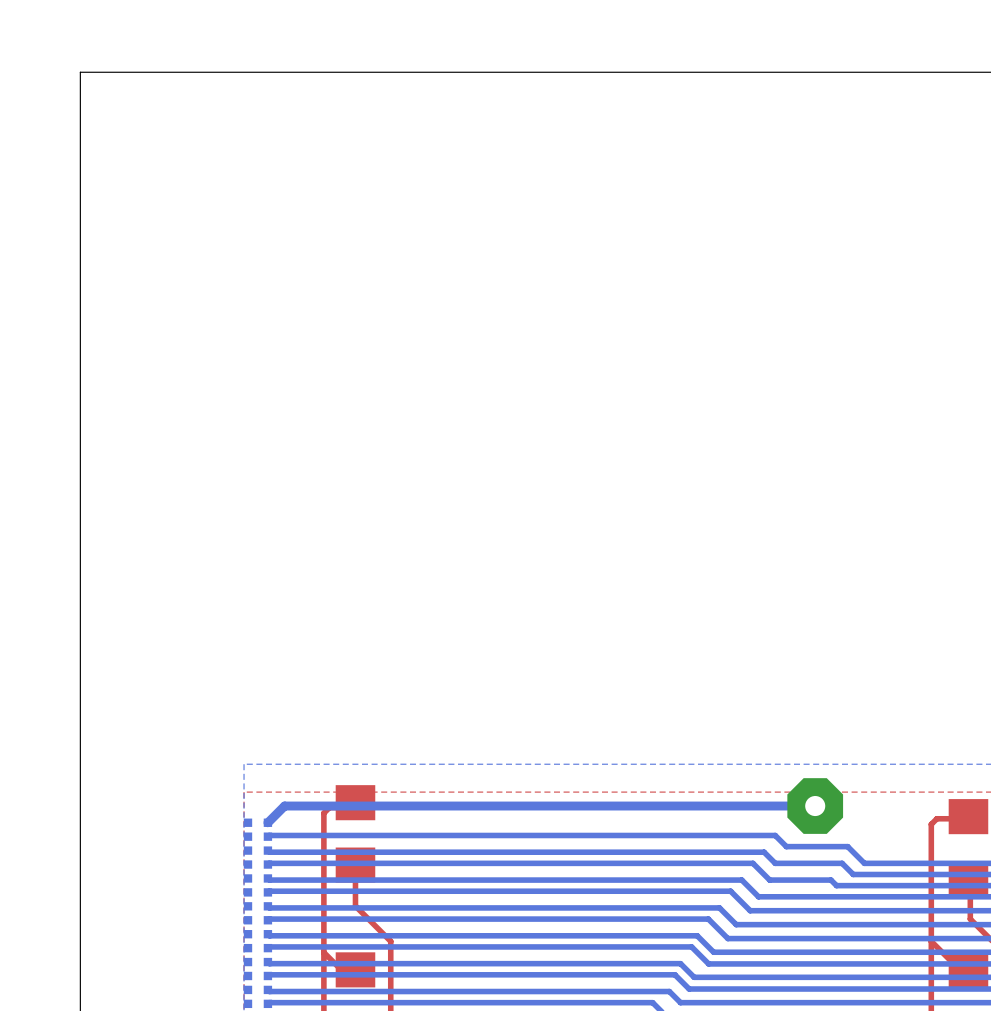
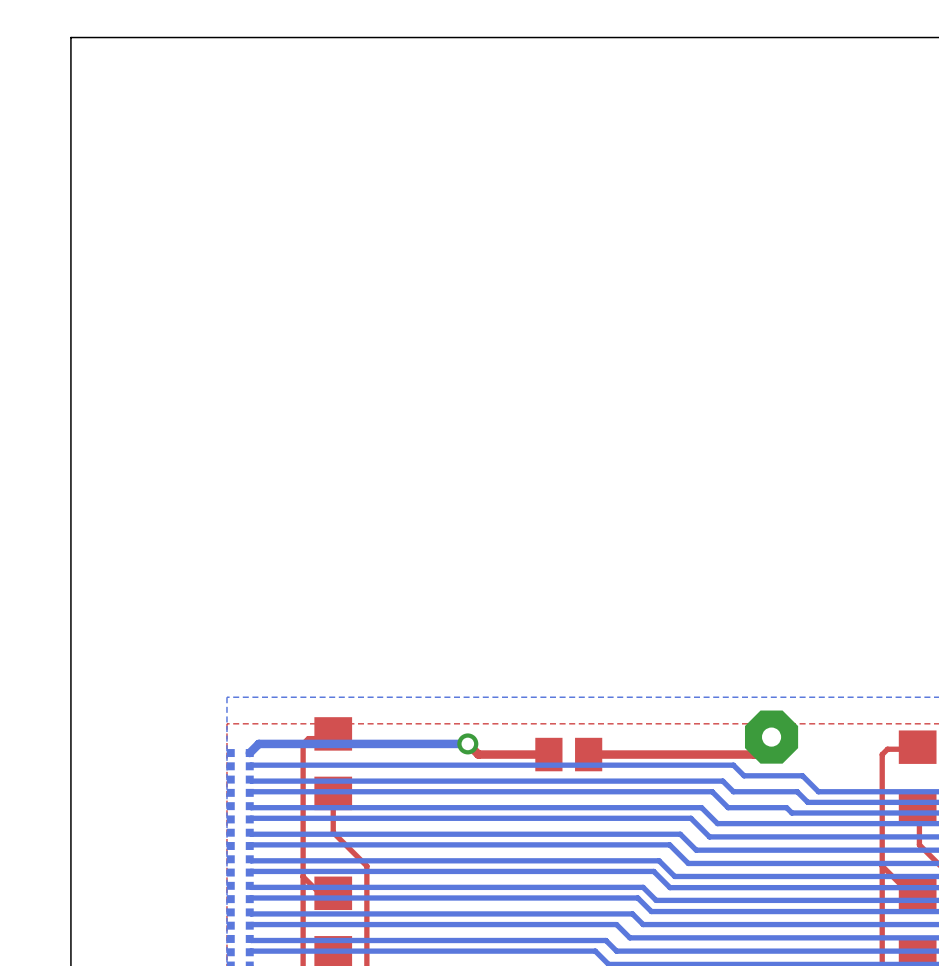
top track: none -> (771, 737) (754, 754) (588, 754)
bottom track: (815, 806) (284, 806) (277, 813) -> (467, 743) (258, 743)
top track: none -> (467, 743) (478, 754) (548, 754)
via: none -> (467, 743)
part: none -> (568, 754)

